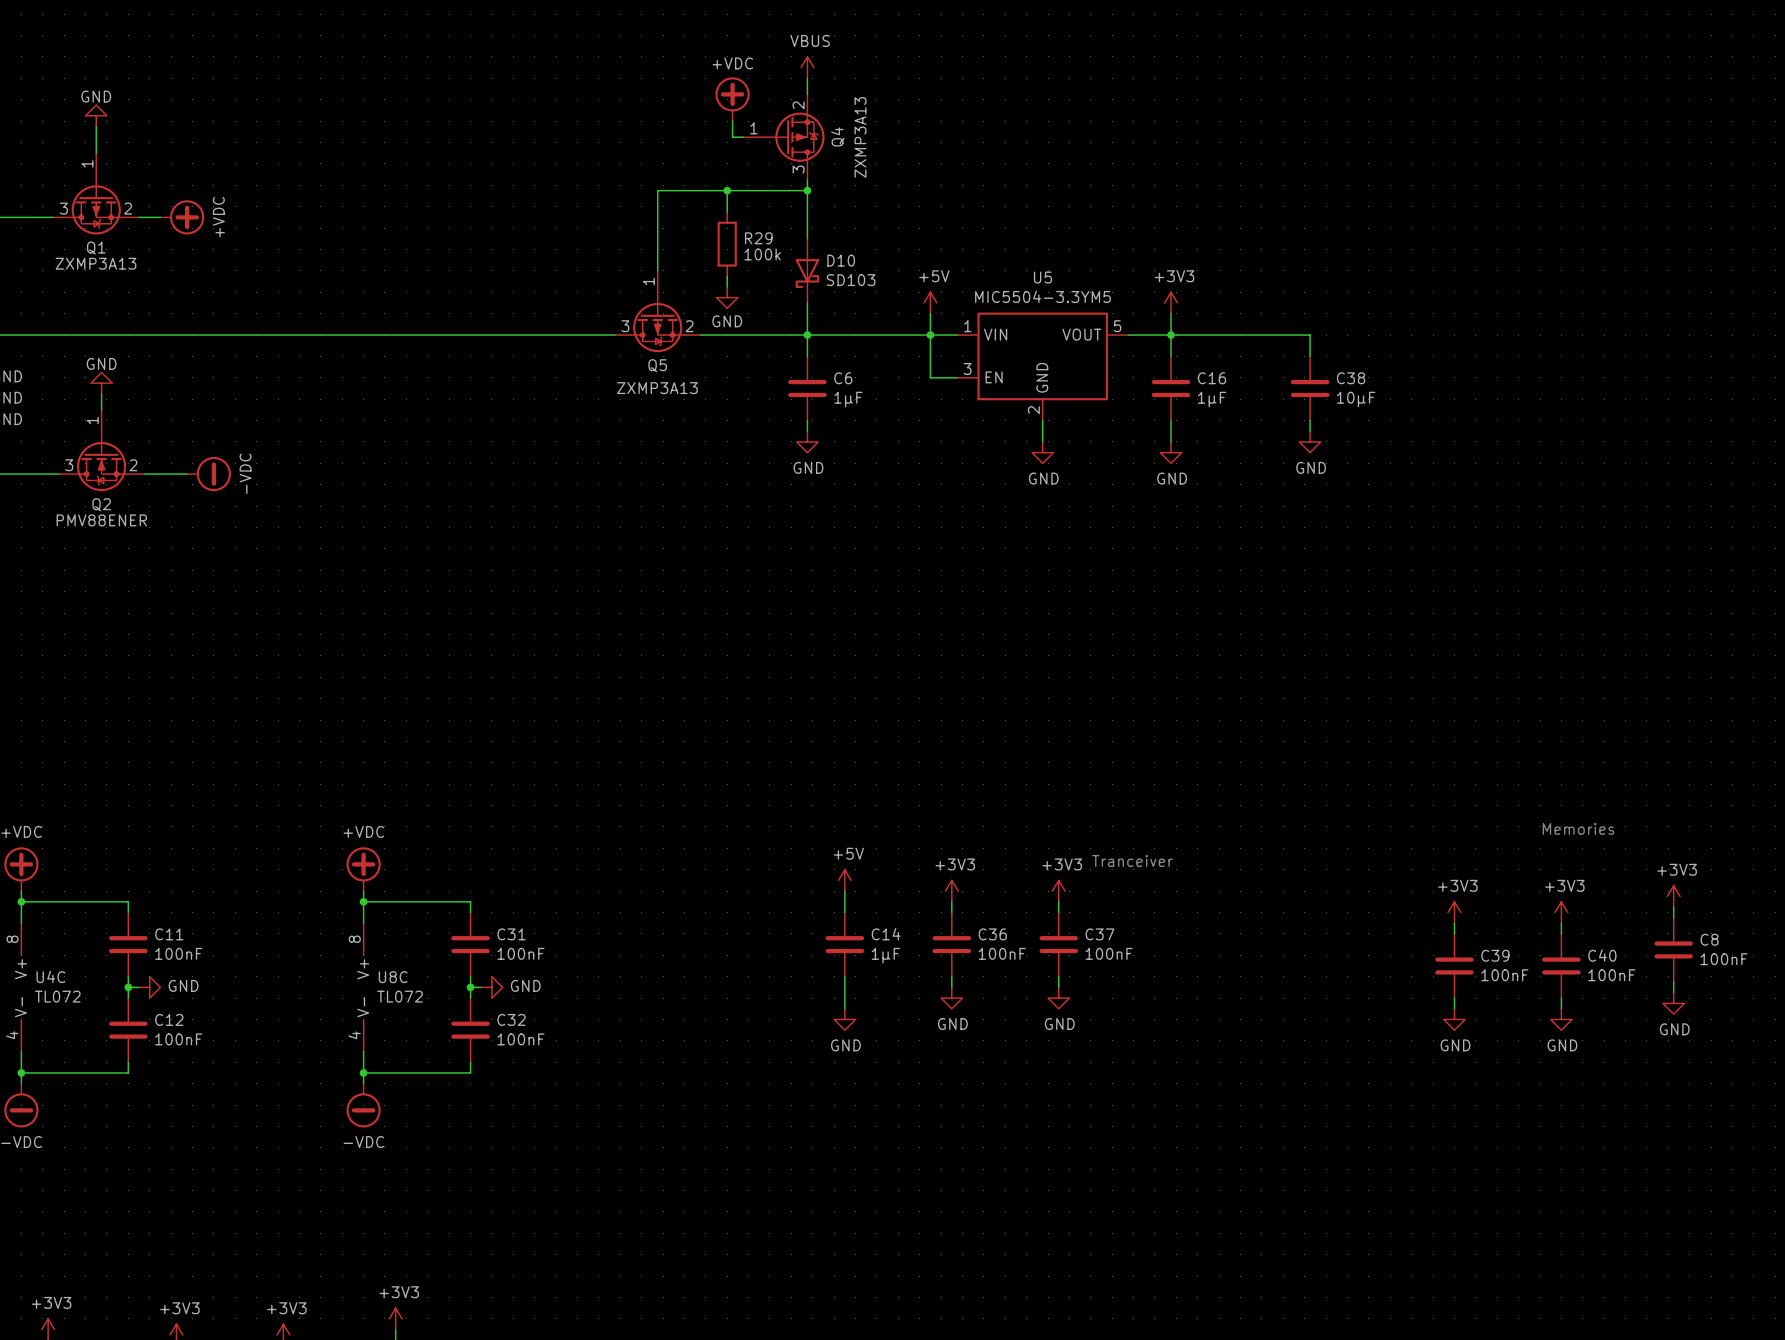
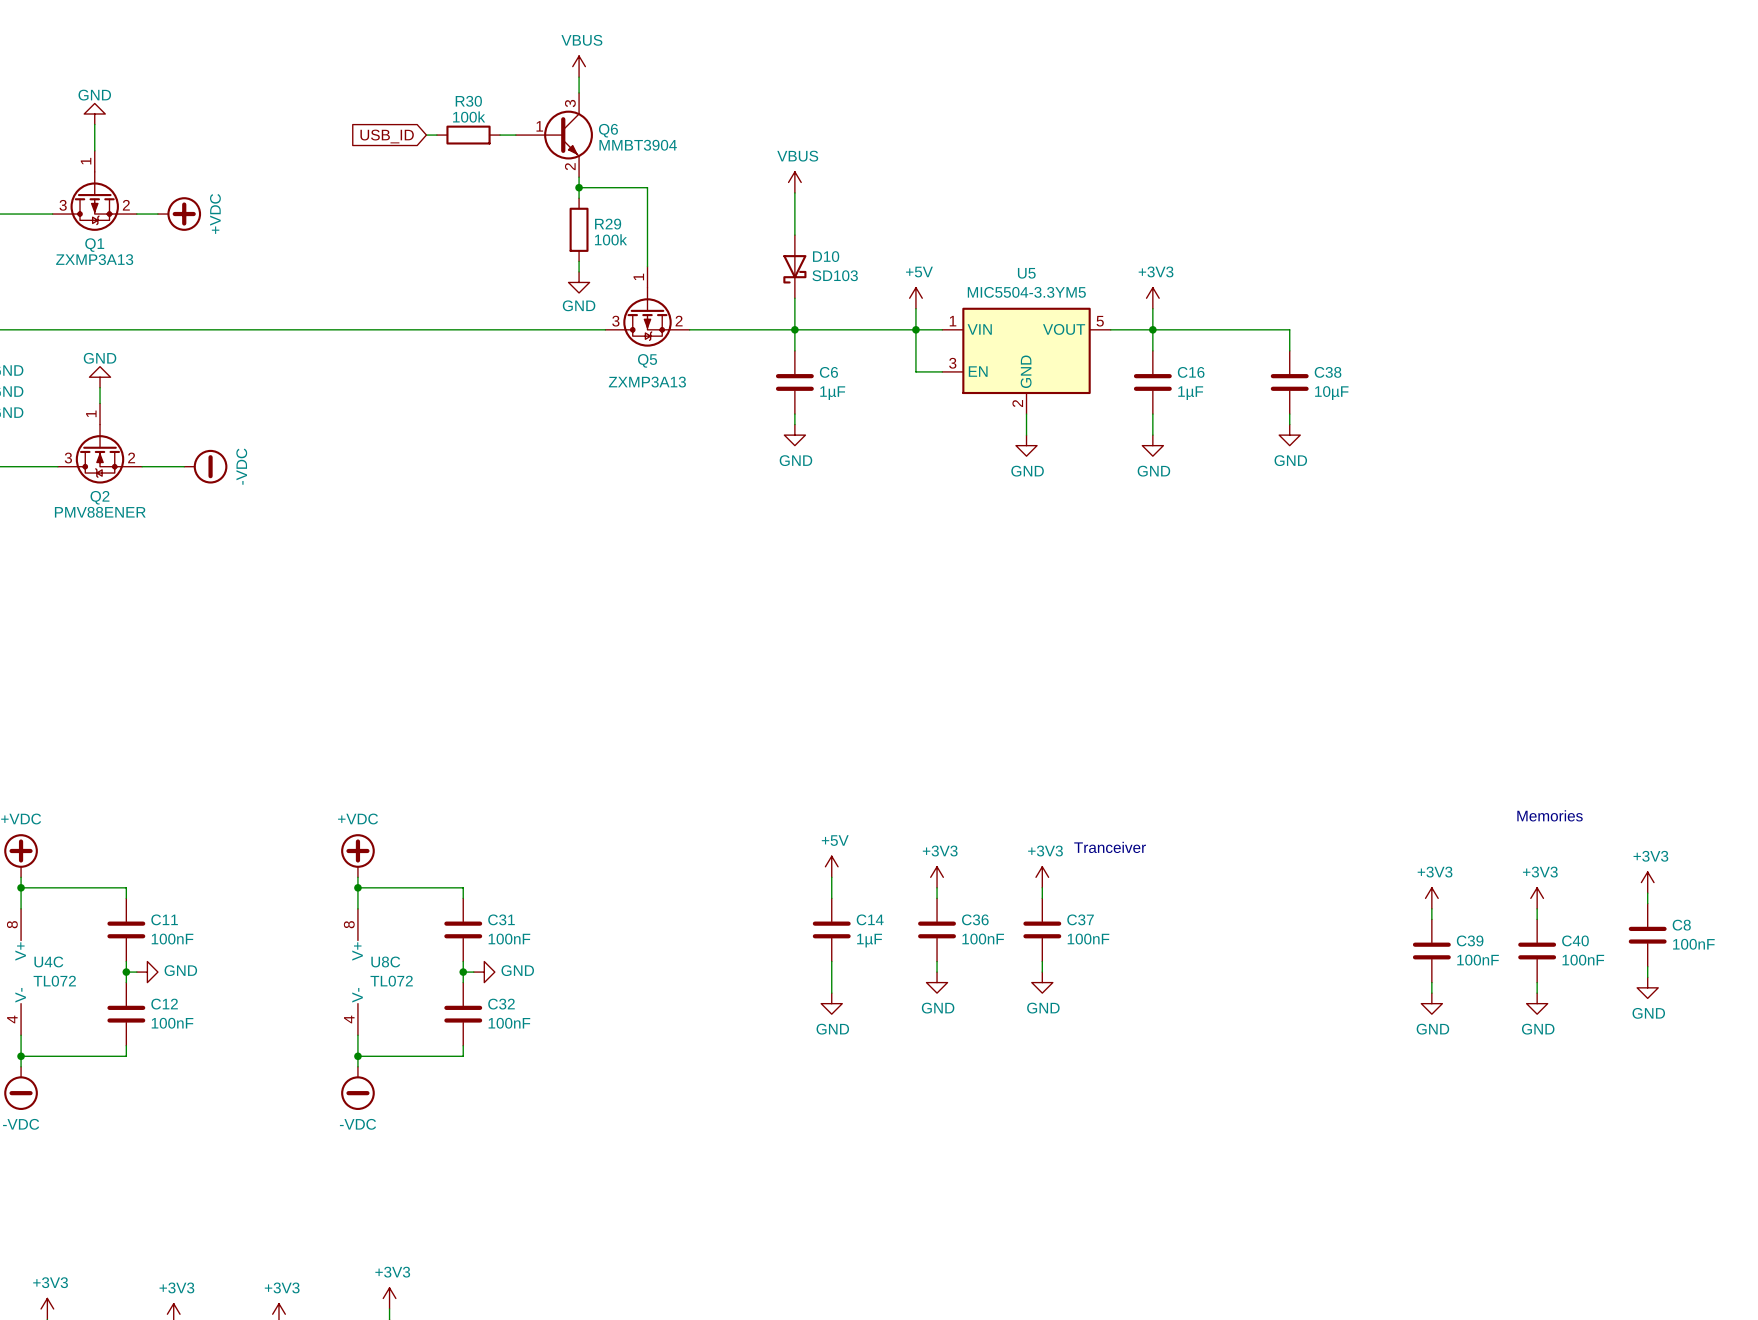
power symbol: none -> VBUS (579, 66)
power symbol: VBUS (807, 67) -> none
wire: none -> (579, 77) (579, 92)
wire: (807, 78) (807, 94) -> none
power symbol: +VDC (732, 99) -> none
wire: (732, 121) (732, 137) (743, 137) -> none
global label: none -> USB_ID (387, 136)
wire: none -> (426, 135) (436, 135)
R30: none -> 100k (468, 135)
wire: none -> (500, 135) (515, 135)
Q6: none -> MMBT3904 (554, 135)
Q4: ZXMP3A13 (783, 137) -> none
power symbol: none -> VBUS (794, 182)
junction: none -> (579, 187)
wire: (657, 190) (807, 190) -> (647, 187) (579, 187)
wire: (727, 190) (727, 212) -> (579, 177) (579, 198)
junction: (727, 190) -> none
junction: (807, 190) -> none
R29 position: (727, 244) -> (579, 229)
wire: (727, 276) (727, 286) -> (579, 261) (579, 271)
power symbol position: GND (727, 297) -> GND (579, 282)

